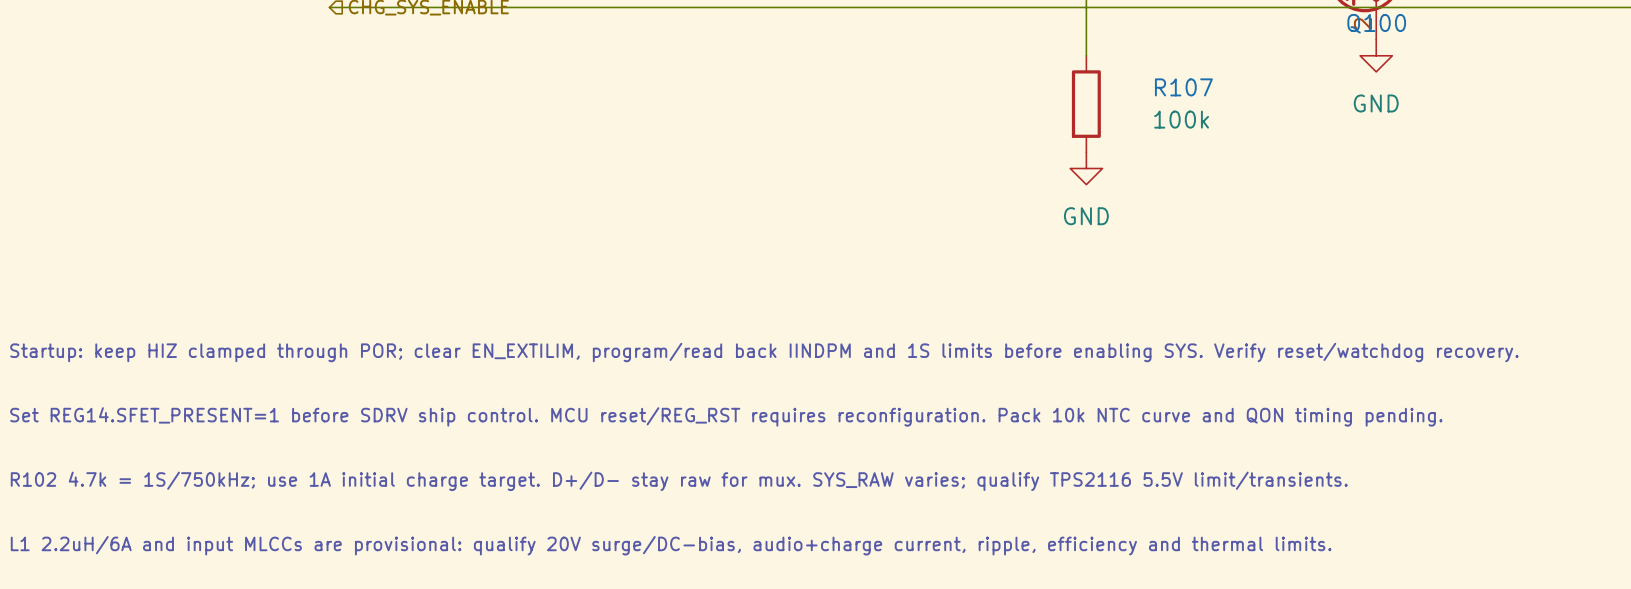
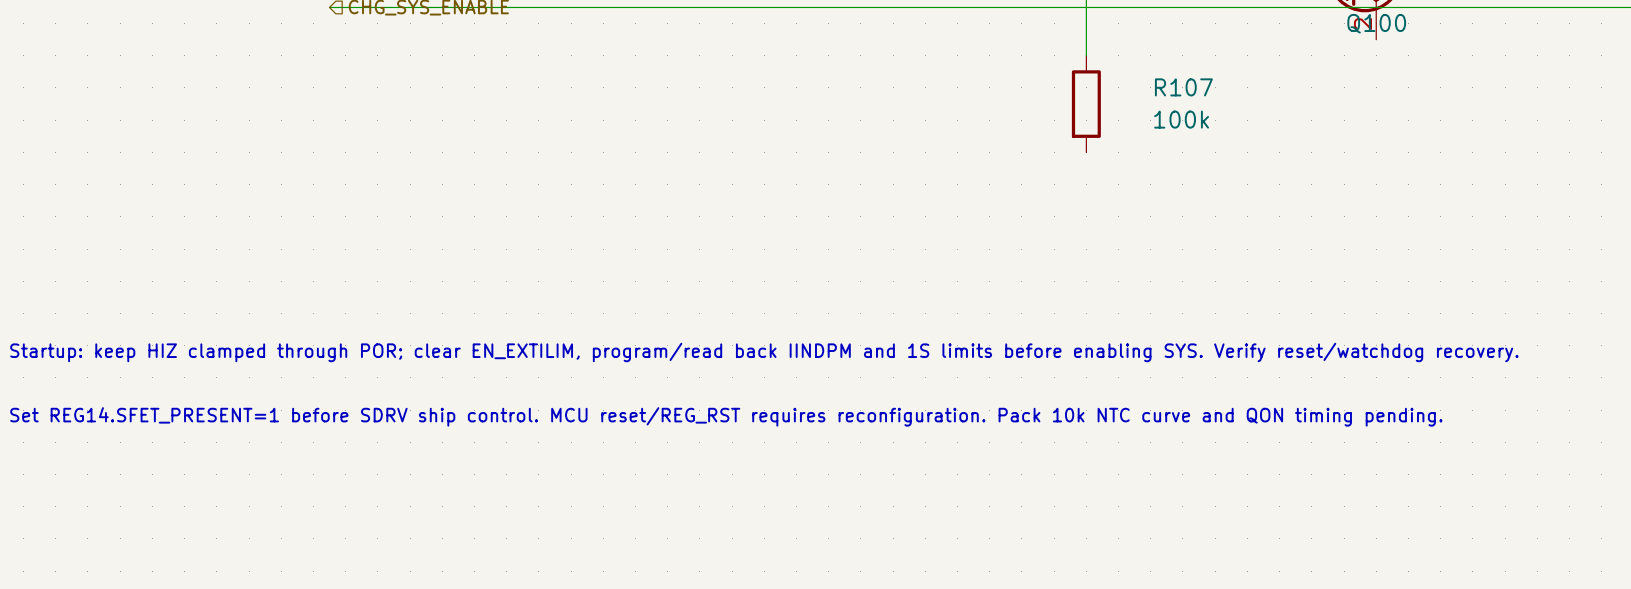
power symbol: GND (1376, 55) -> none
power symbol: GND (1086, 168) -> none
text: R102 4.7k = 1S/750kHz; use 1A initial charge target. D+/D− stay raw for mux. SYS_RAW varies; qualify TPS2116 5.5V limit/transients. (679, 481) -> none
text: L1 2.2uH/6A and input MLCCs are provisional: qualify 20V surge/DC-bias, audio+charge current, ripple, efficiency and thermal limits. (671, 545) -> none

